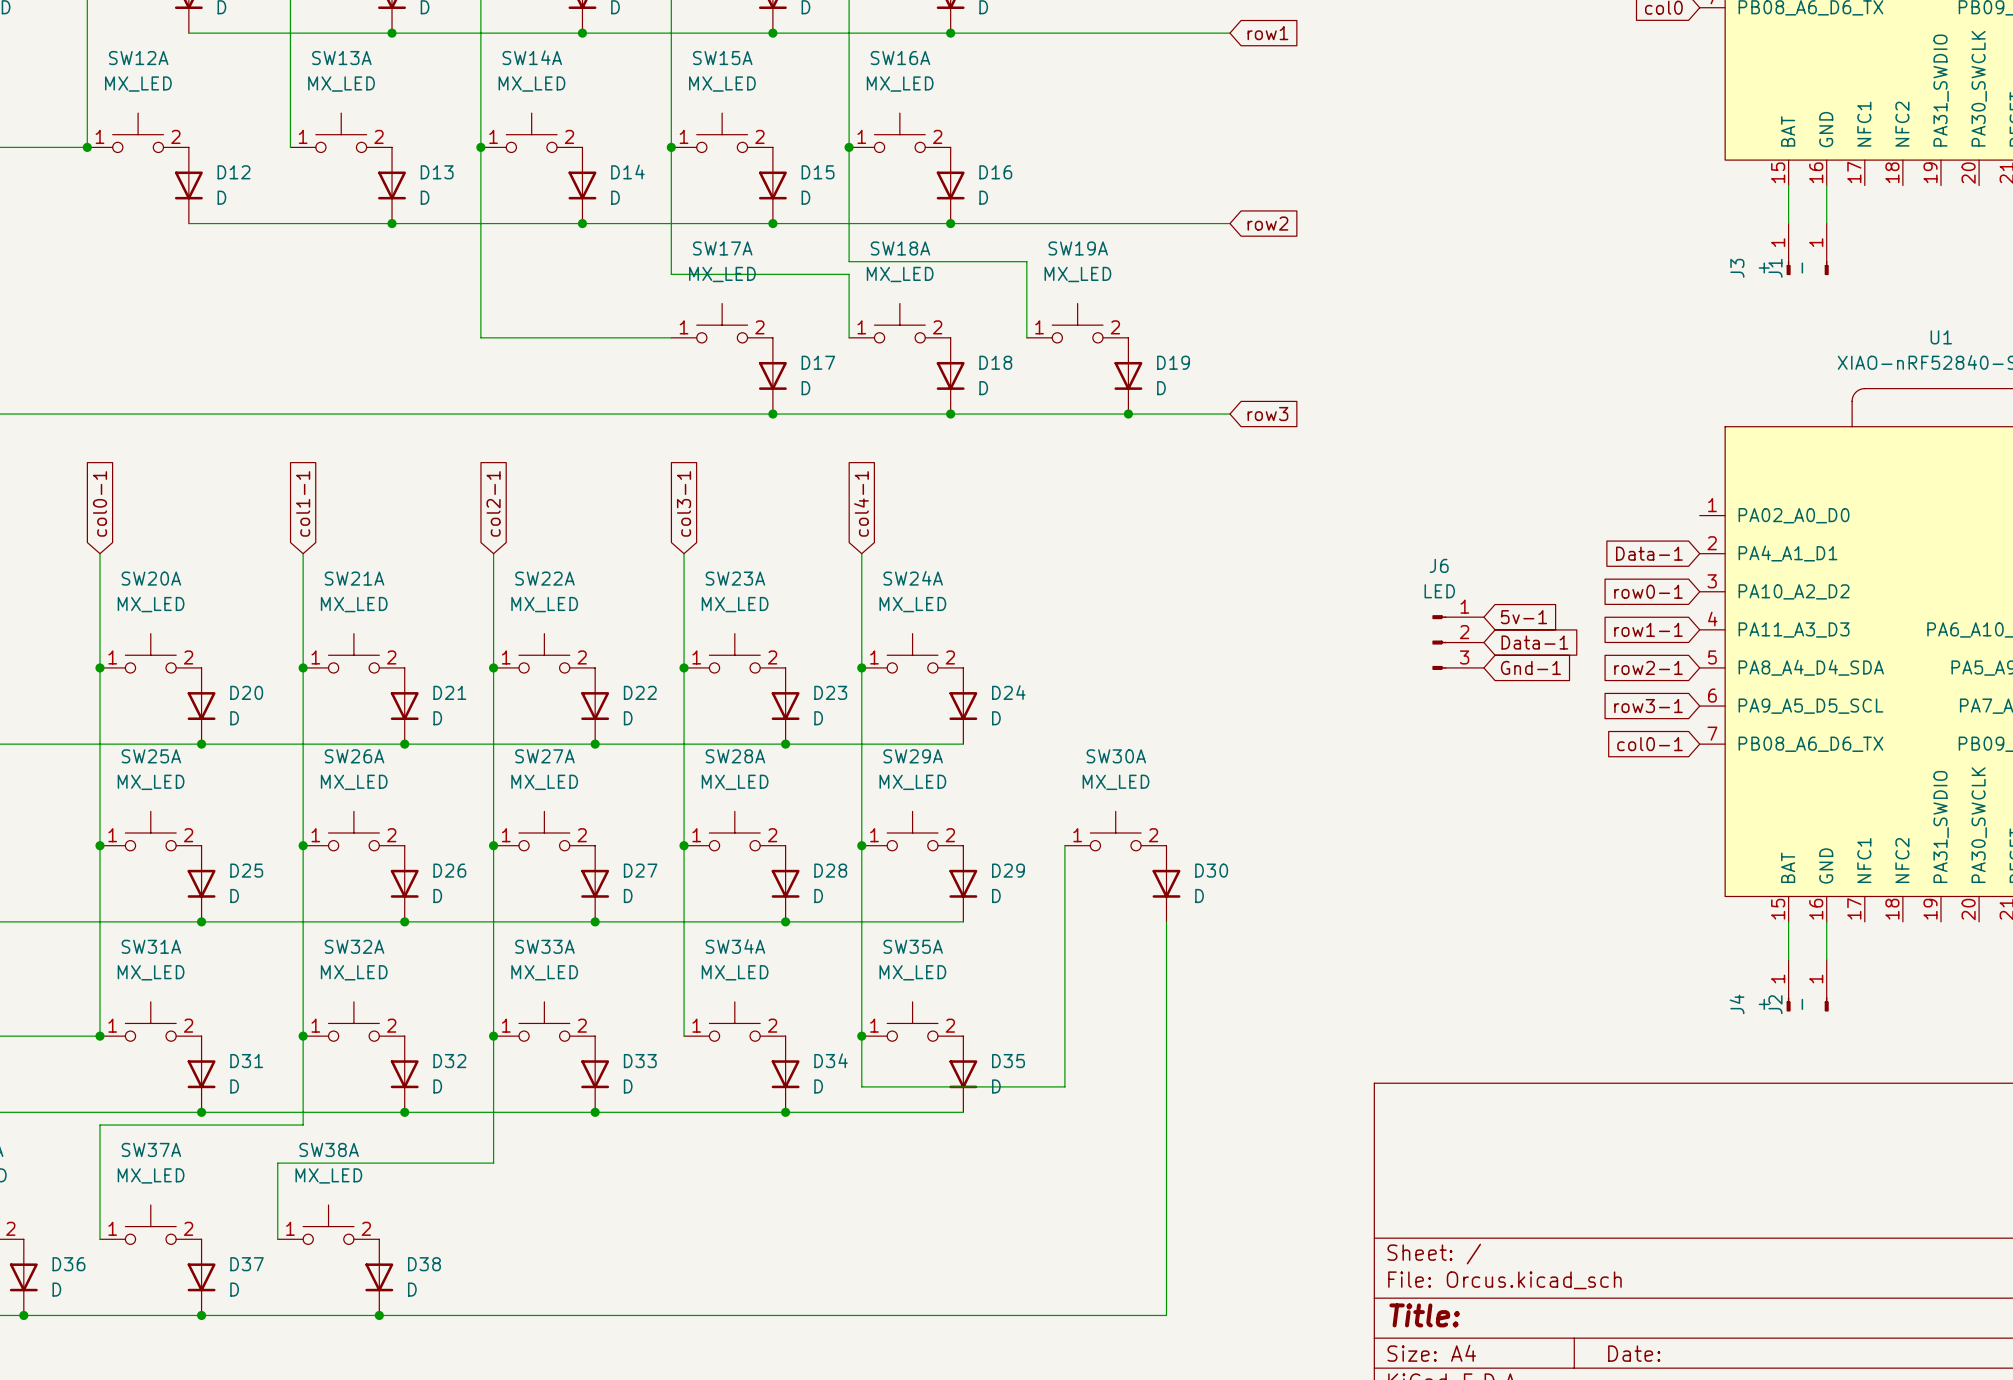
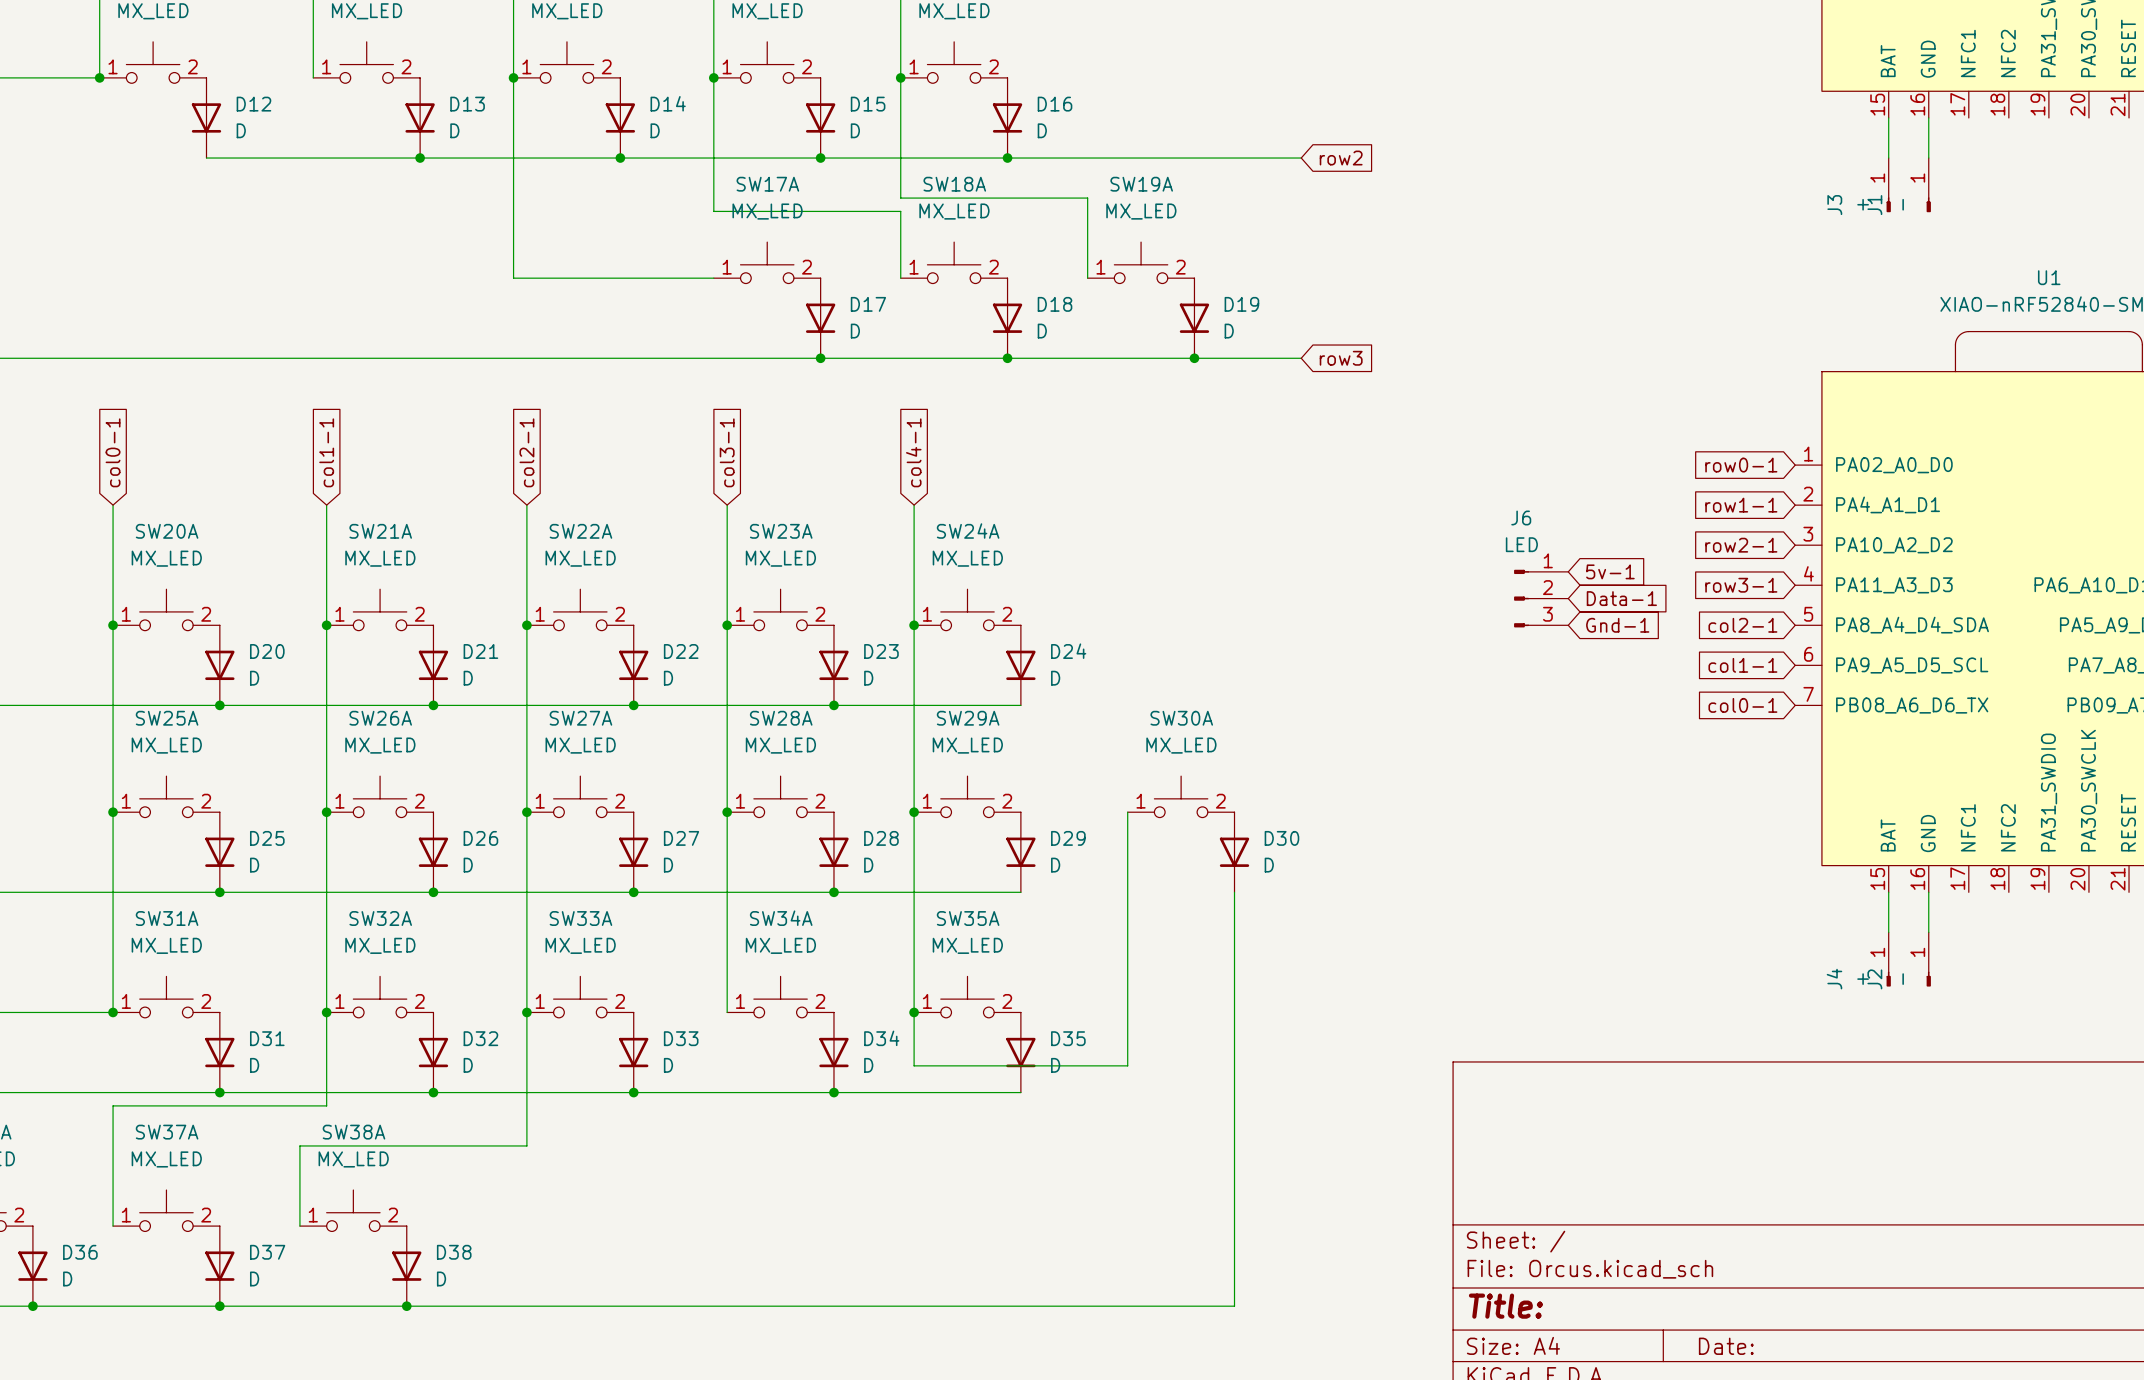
global label: none -> row0-1 (1741, 465)
global label: Data-1 (1649, 553) -> row1-1 (1741, 505)
global label: row0-1 (1648, 591) -> row2-1 (1741, 545)
global label: row1-1 (1648, 629) -> row3-1 (1741, 585)
global label: row2-1 (1648, 667) -> col2-1 (1742, 625)
global label: row3-1 (1648, 706) -> col1-1 (1742, 665)

